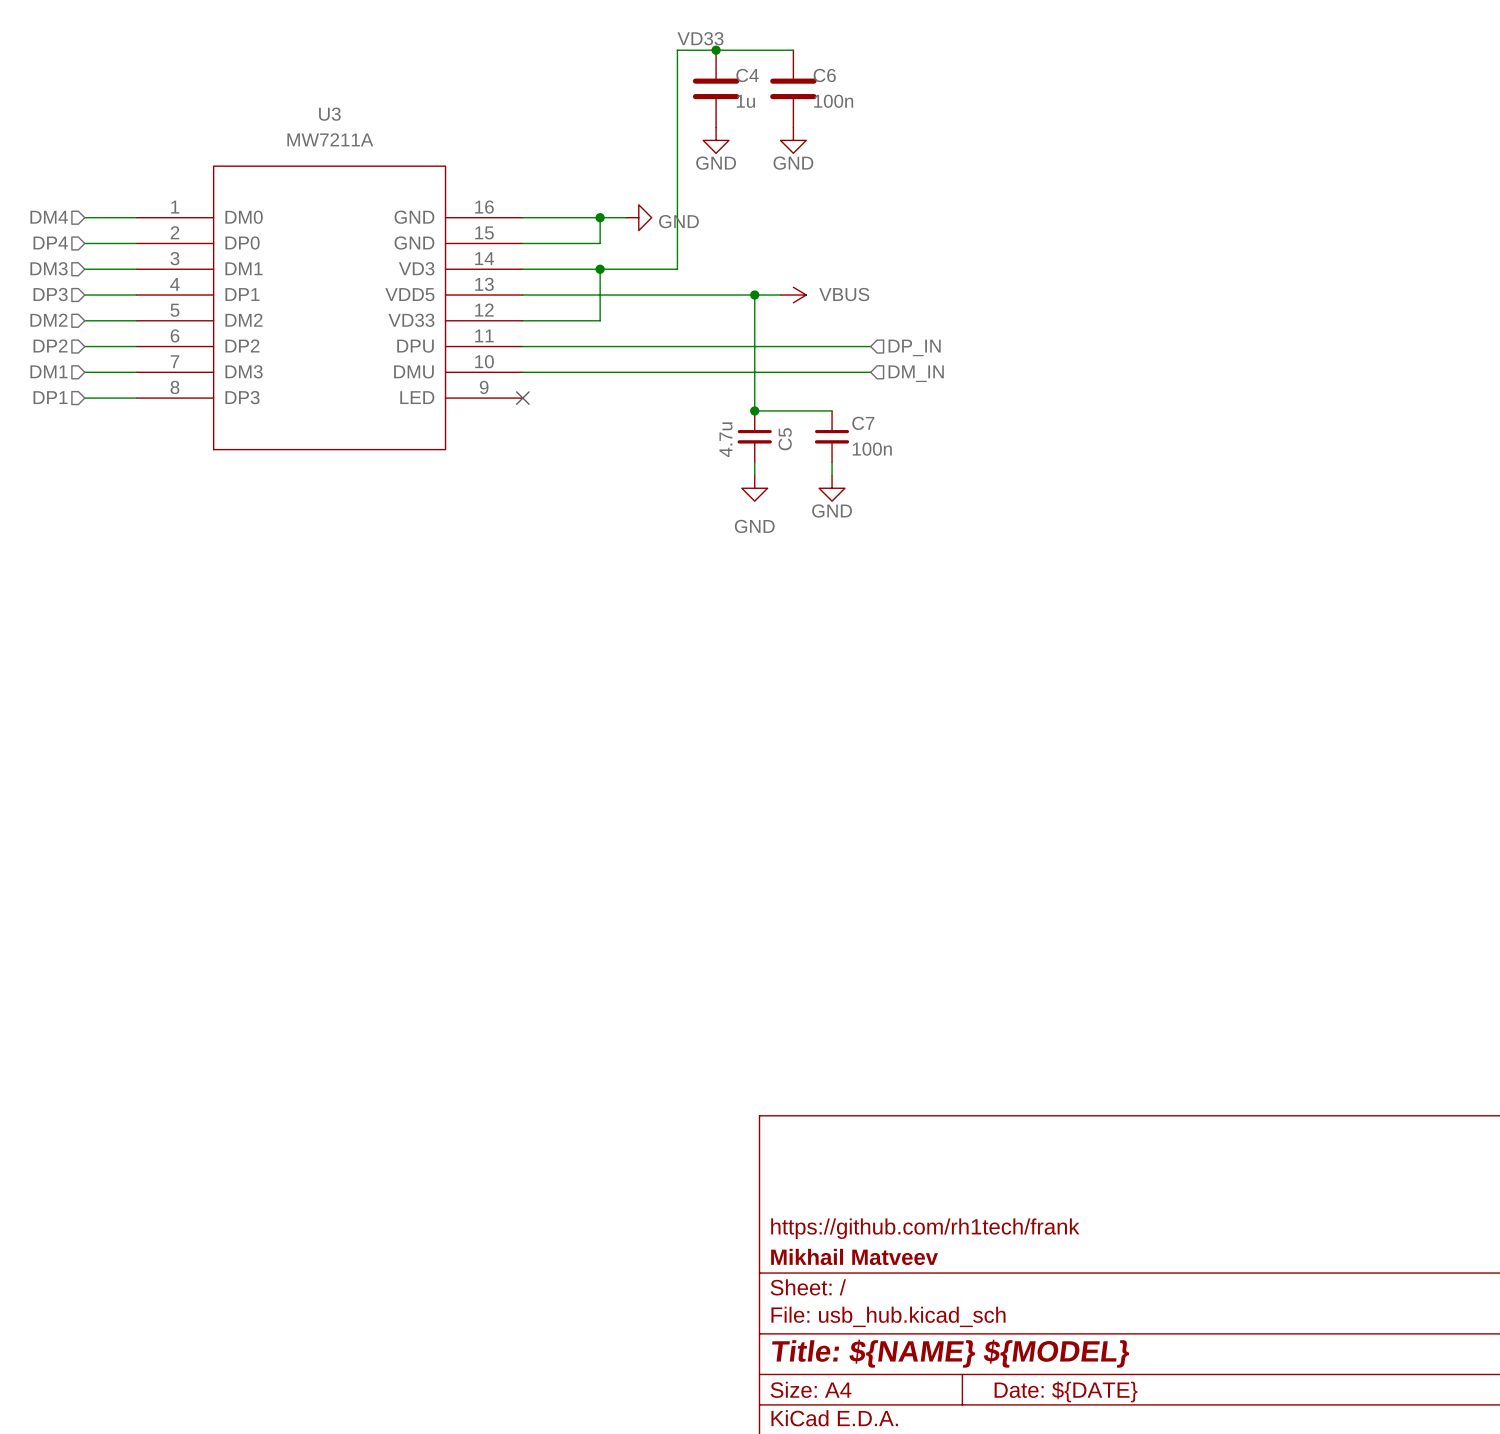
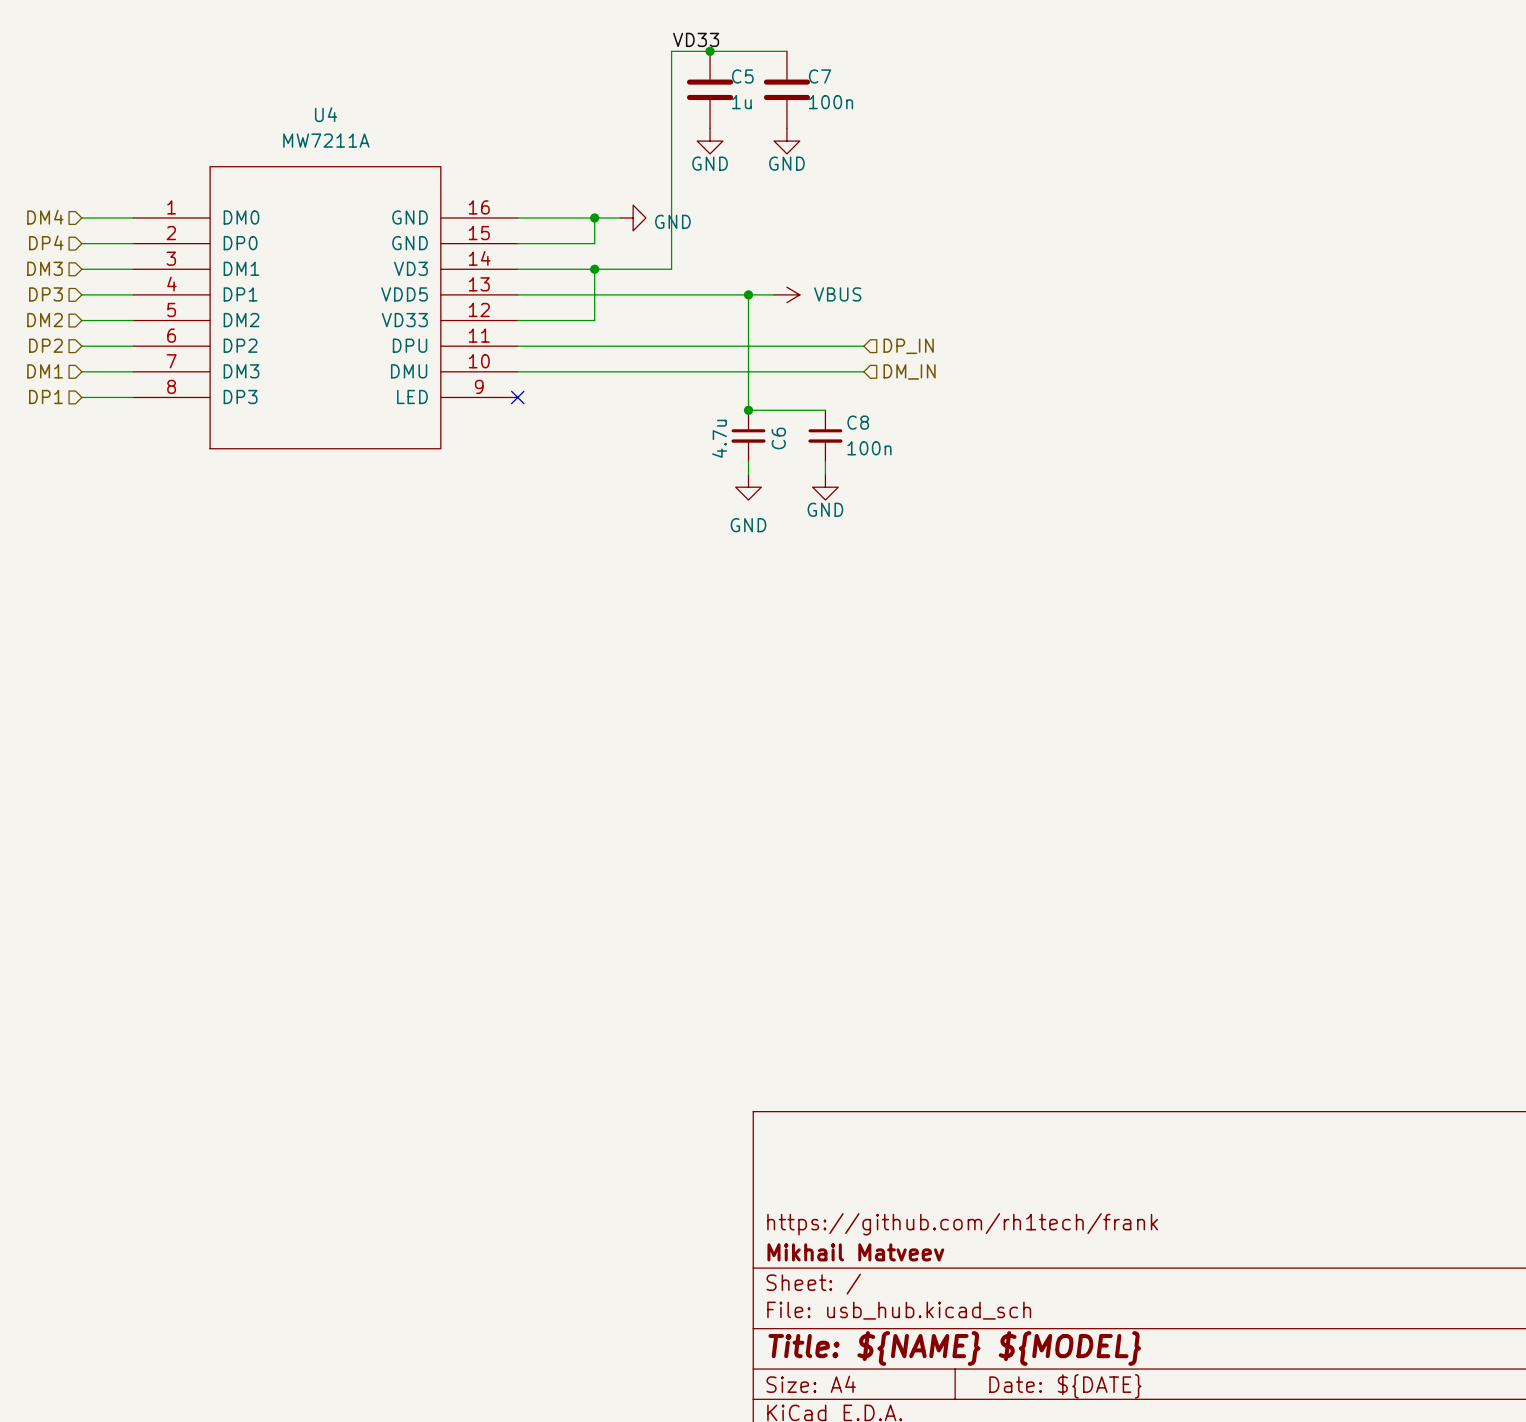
C4 name: C4 (747, 75) -> C5 (742, 76)
C6 name: C6 (824, 75) -> C7 (820, 76)
U3 name: U3 (329, 114) -> U4 (326, 114)
C7 name: C7 (863, 423) -> C8 (858, 422)
C5 name: C5 (785, 439) -> C6 (778, 438)

